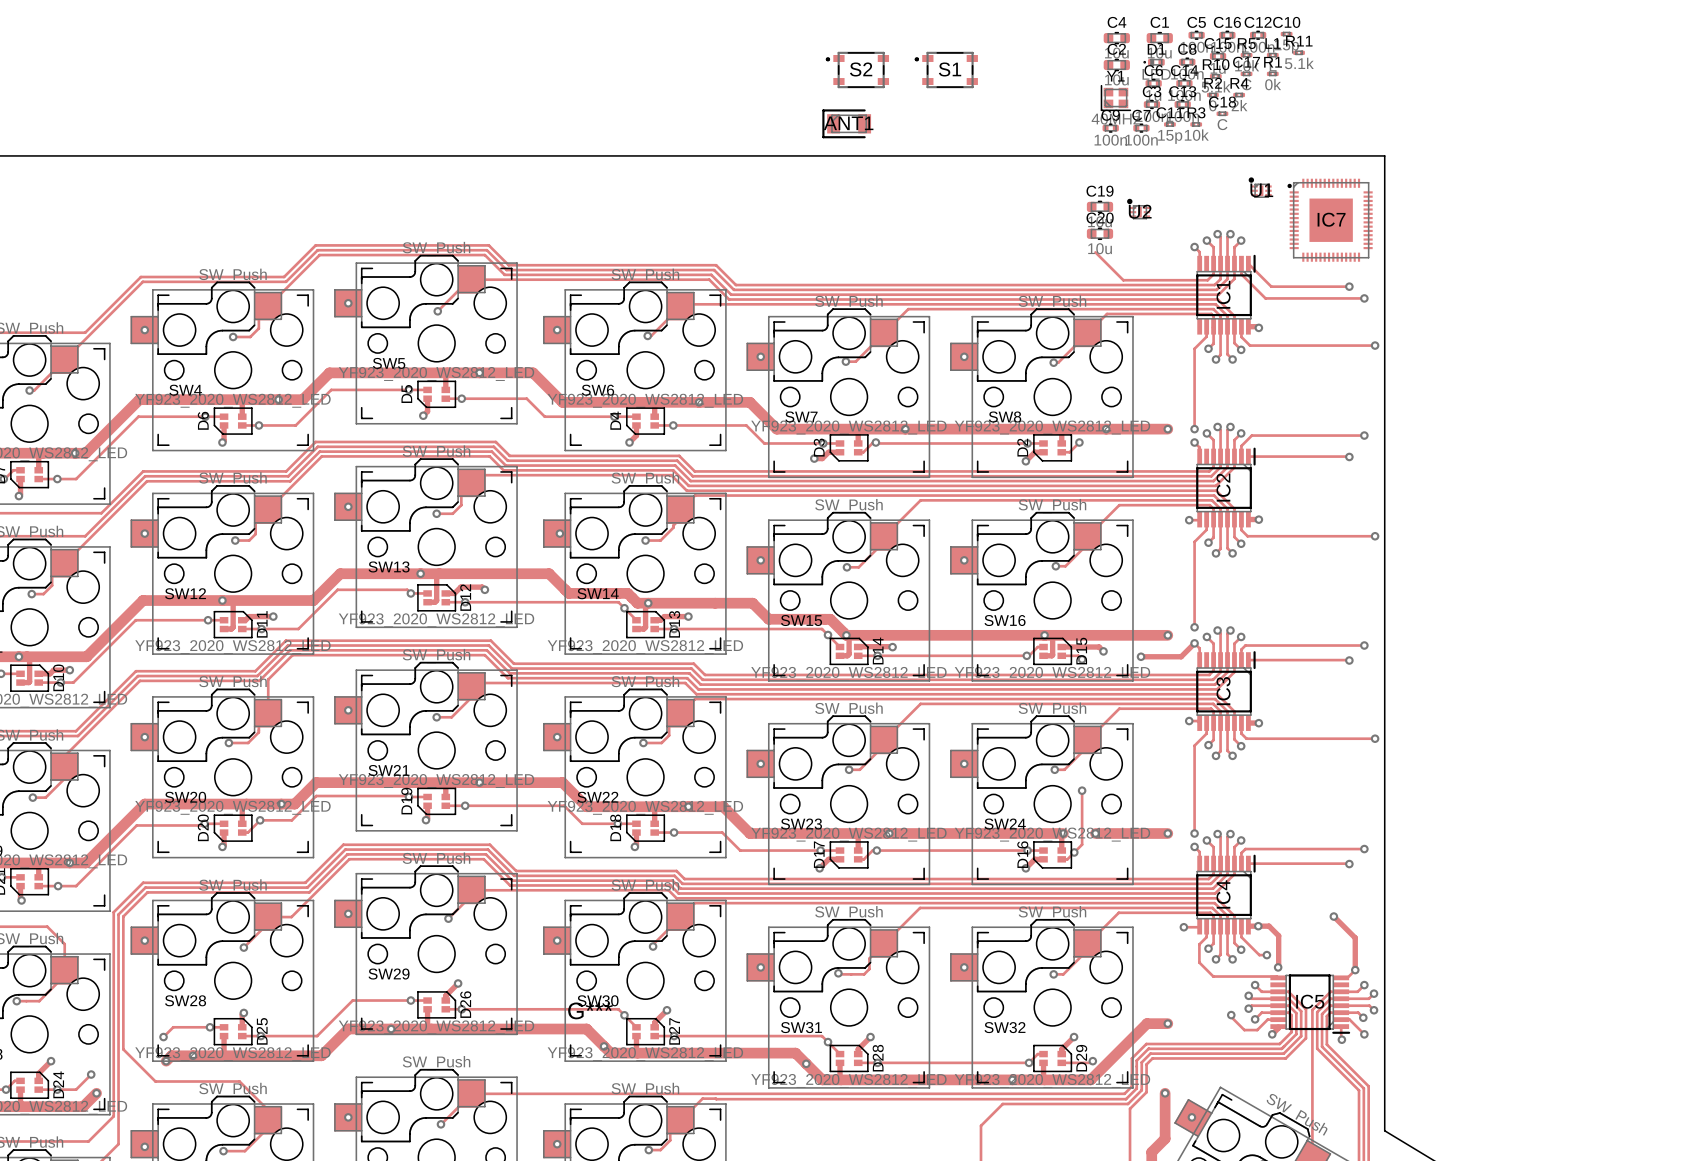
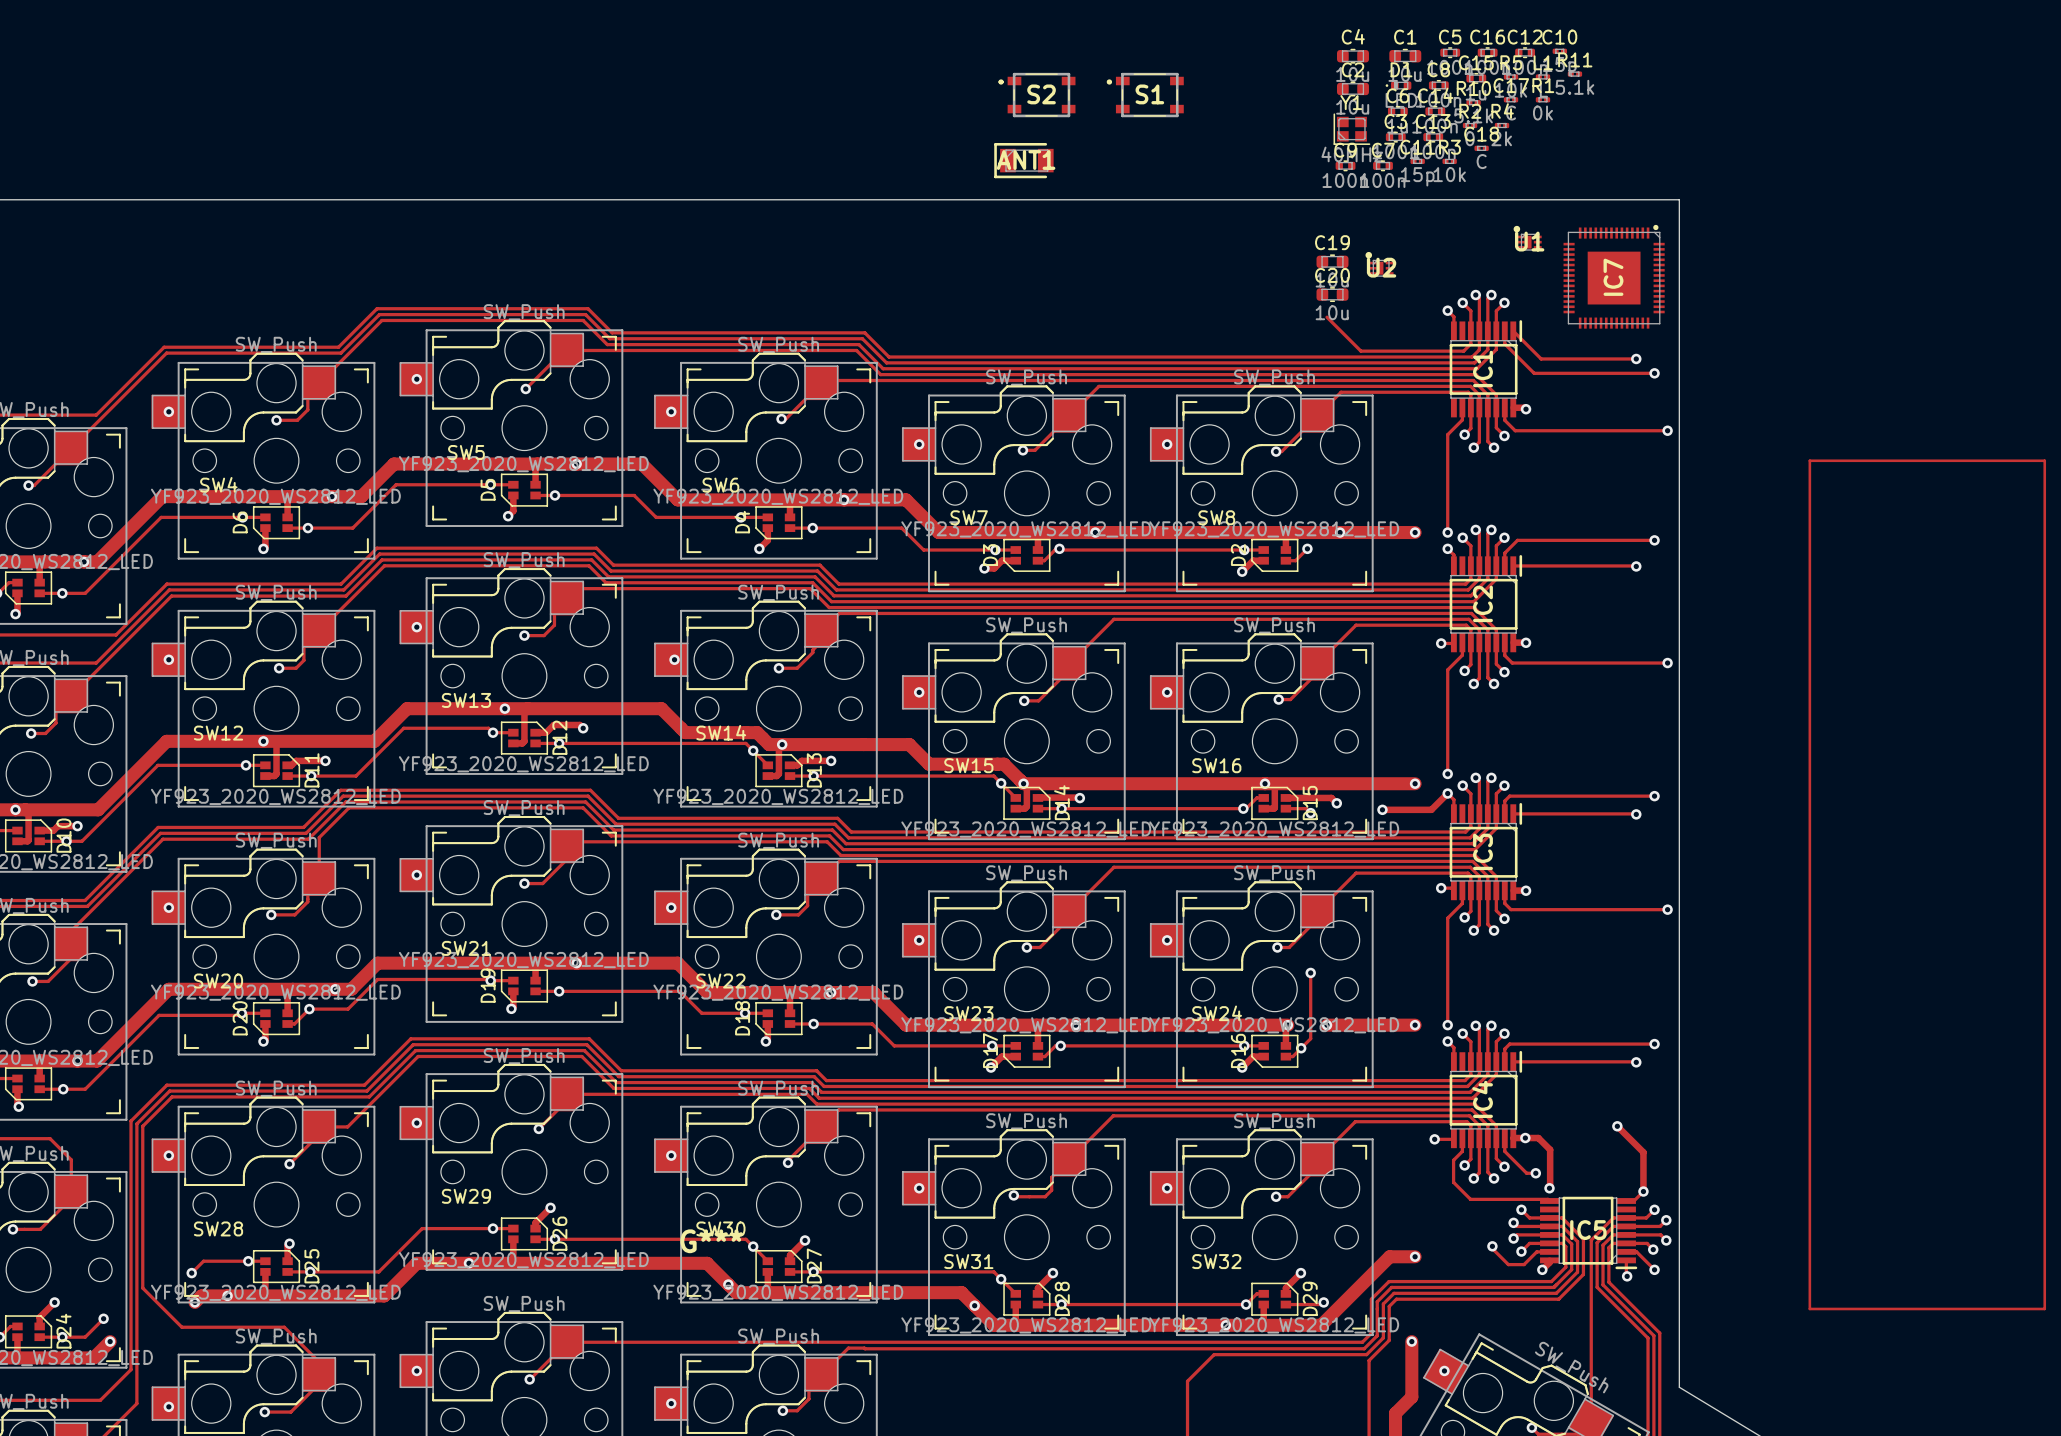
IC7 rotation: 0° (1330, 220) -> 90° clockwise (1614, 276)
track: none -> (1809, 460) (2044, 460) (2044, 1308) (1809, 1308) (1809, 460)

